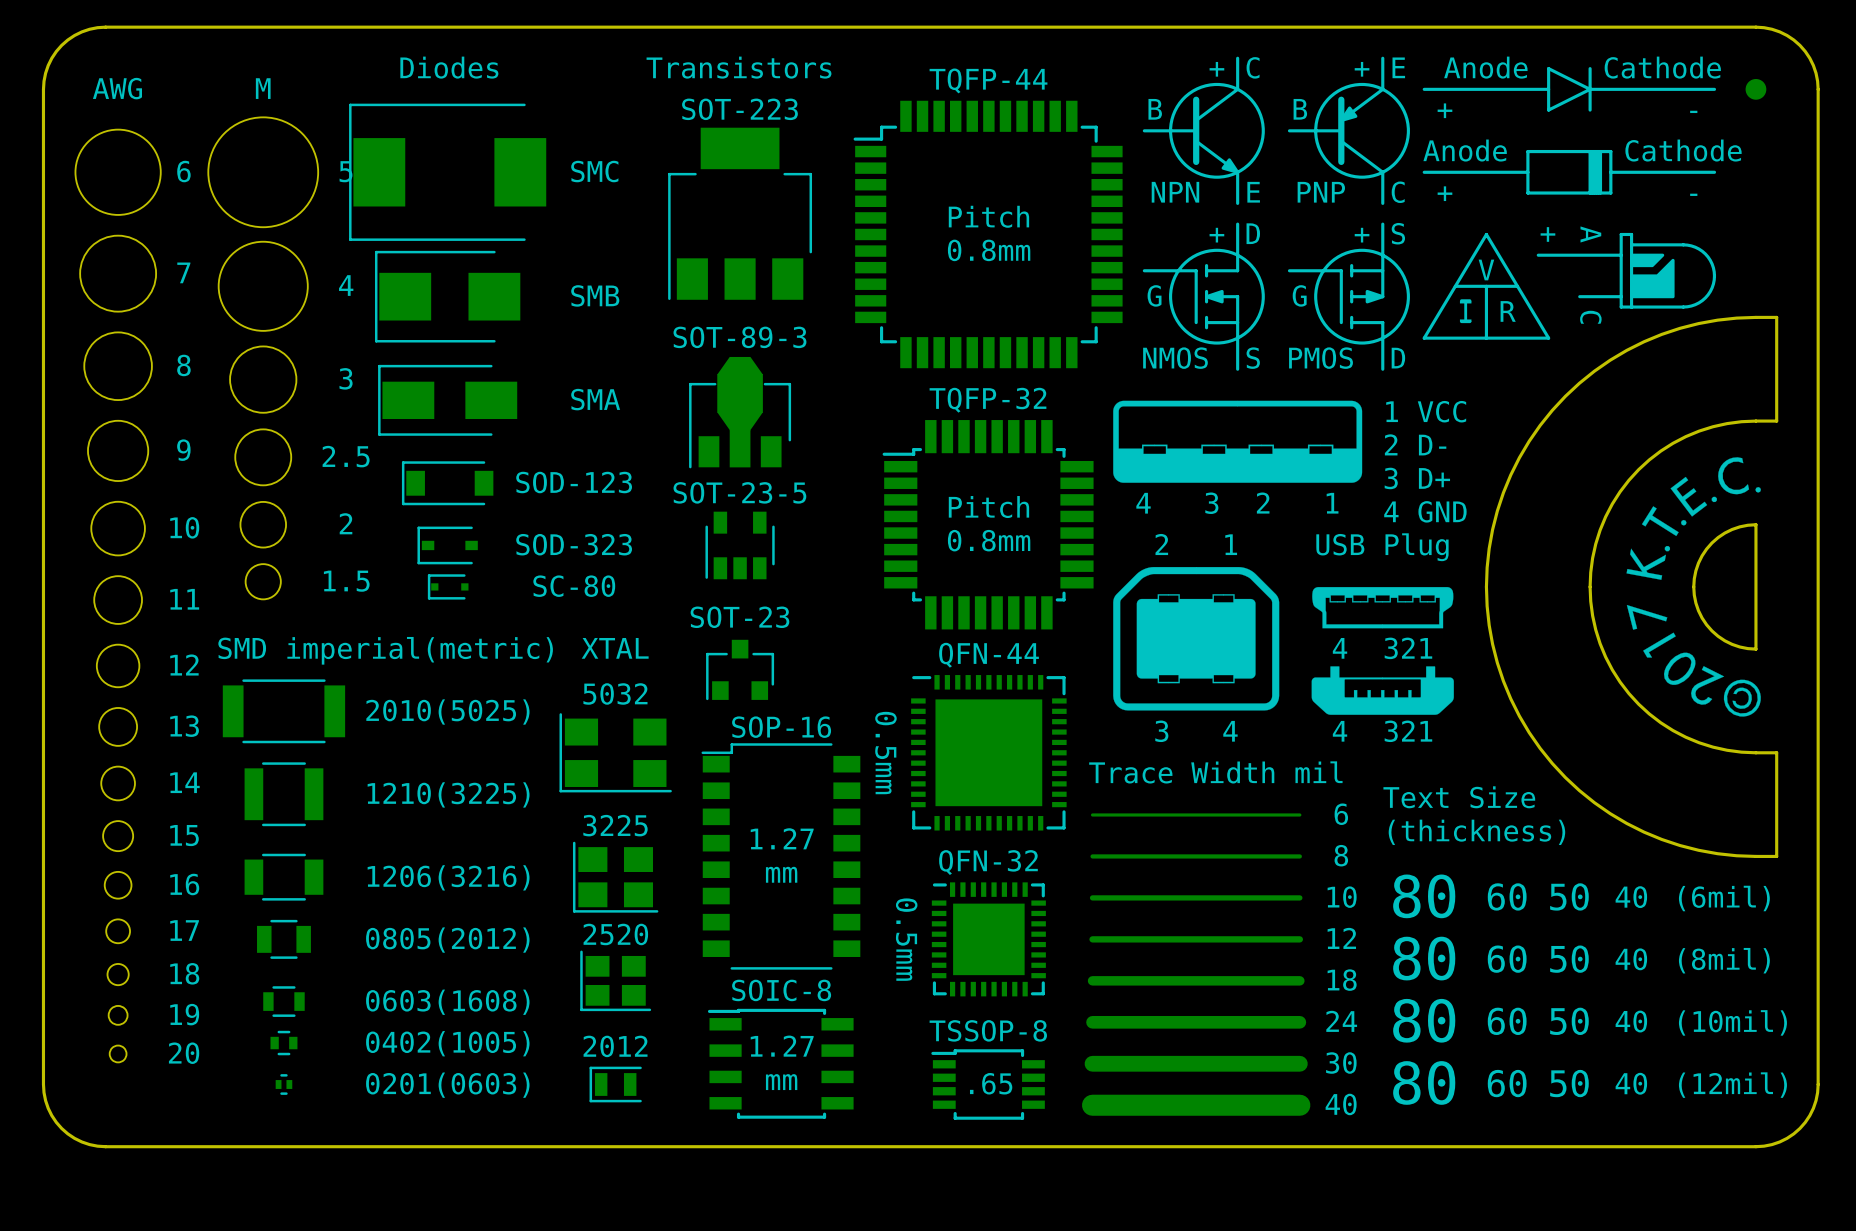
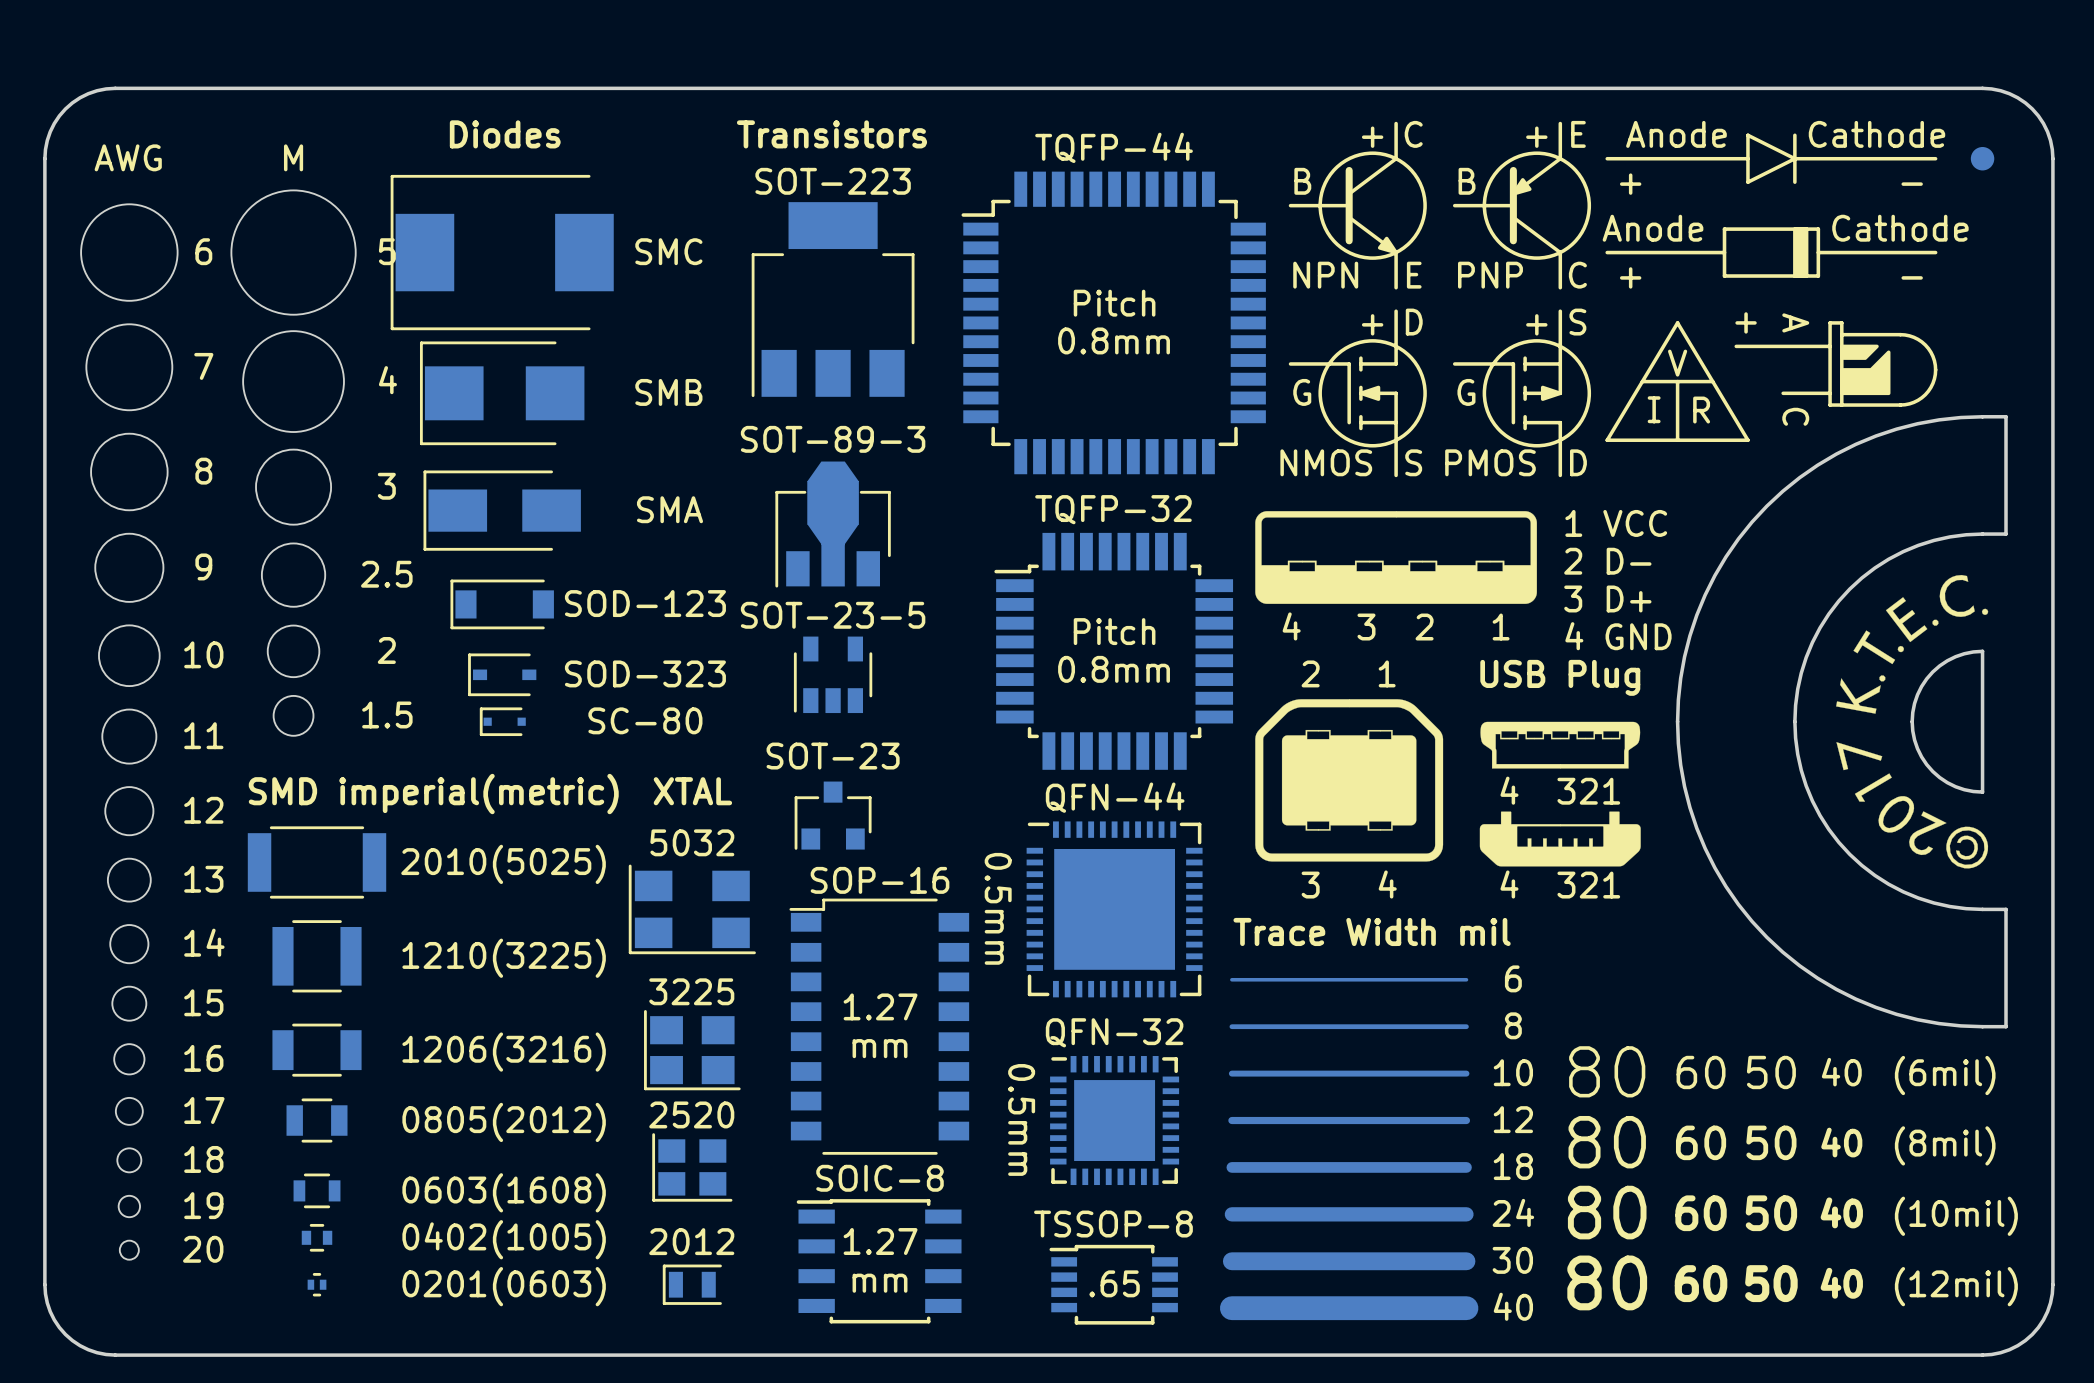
text: Text Size (1459, 797) -> none
text: (thickness) (1476, 832) -> none

